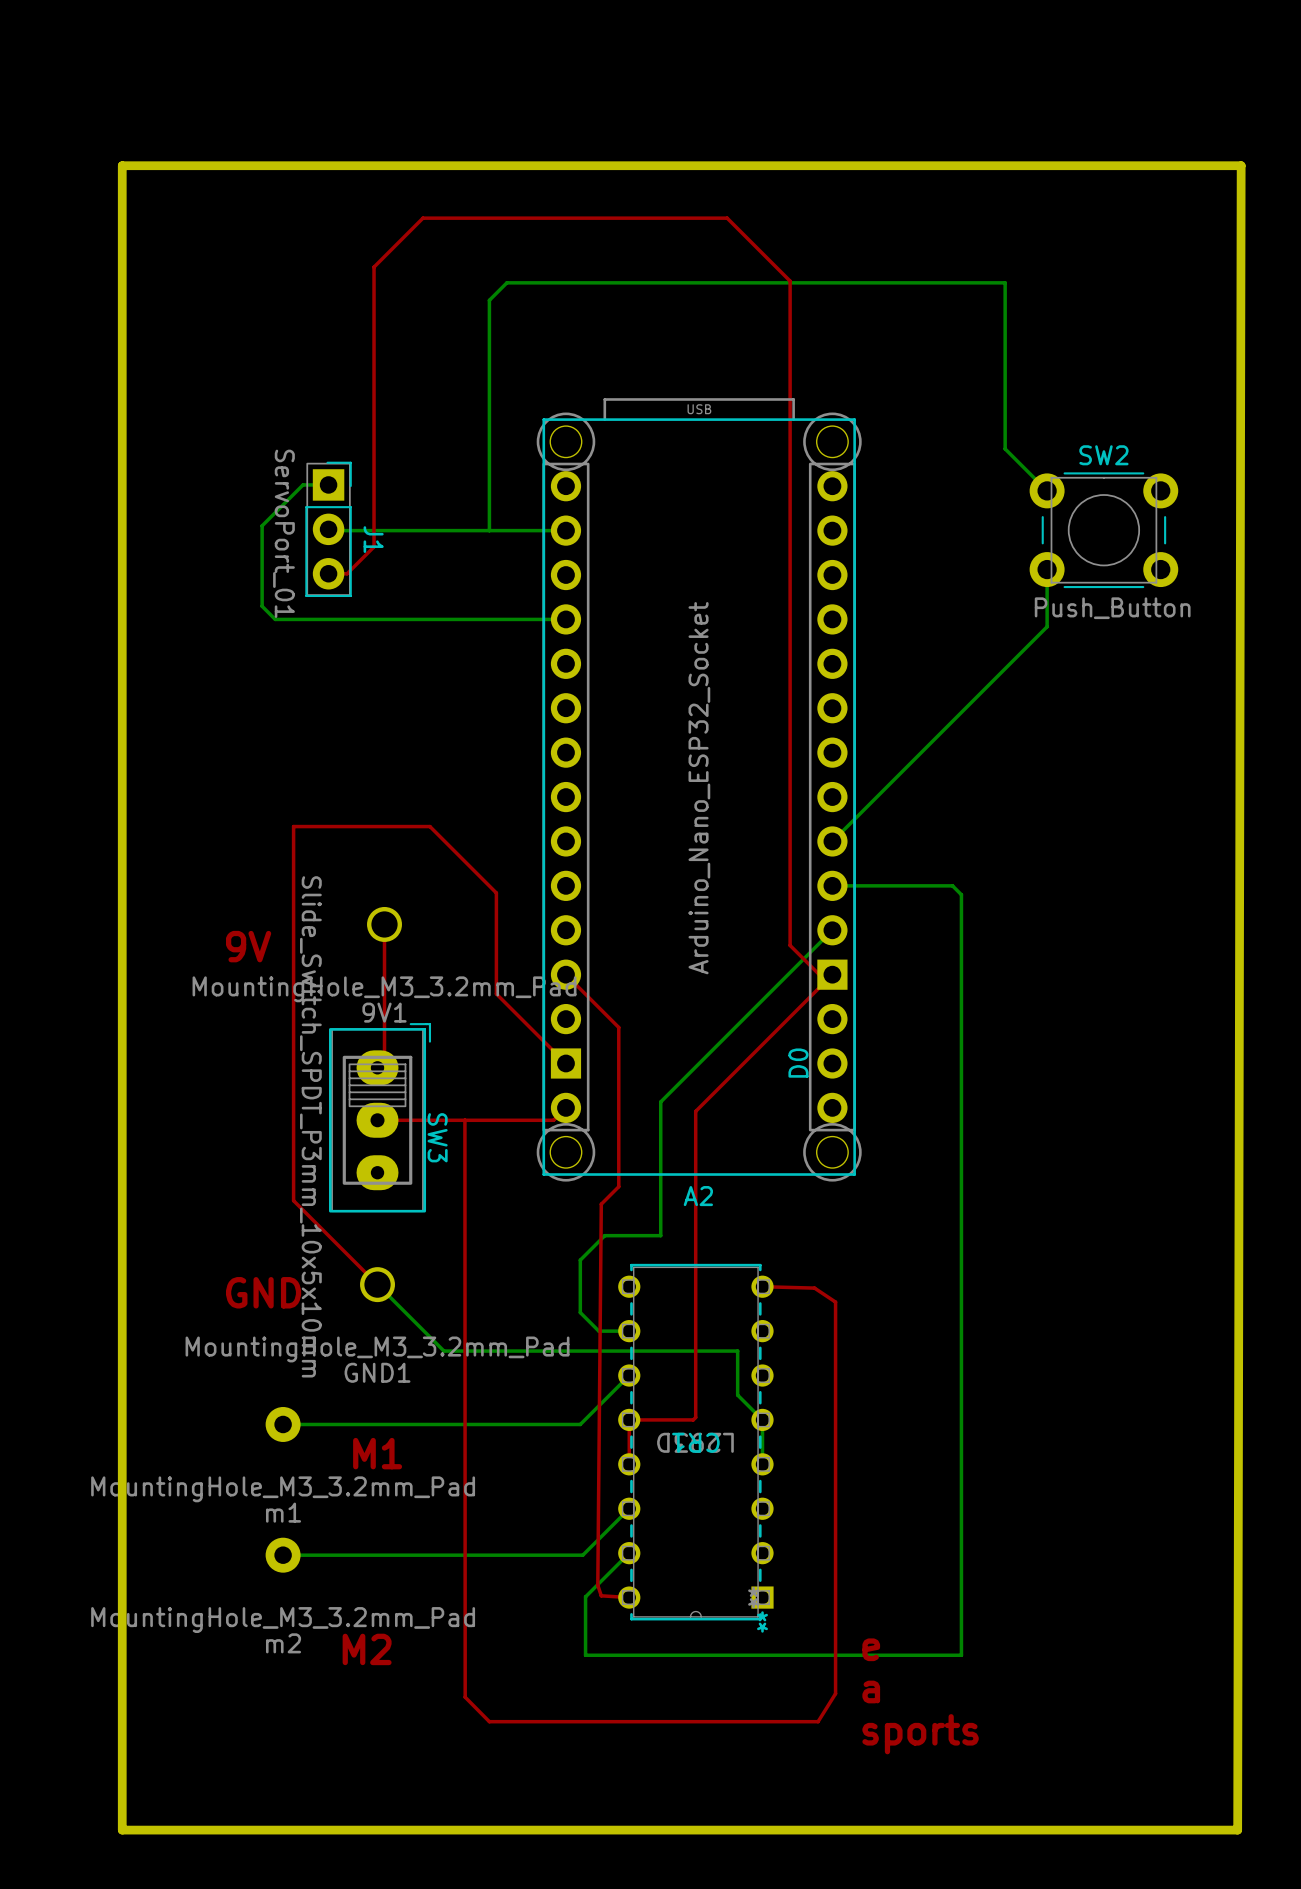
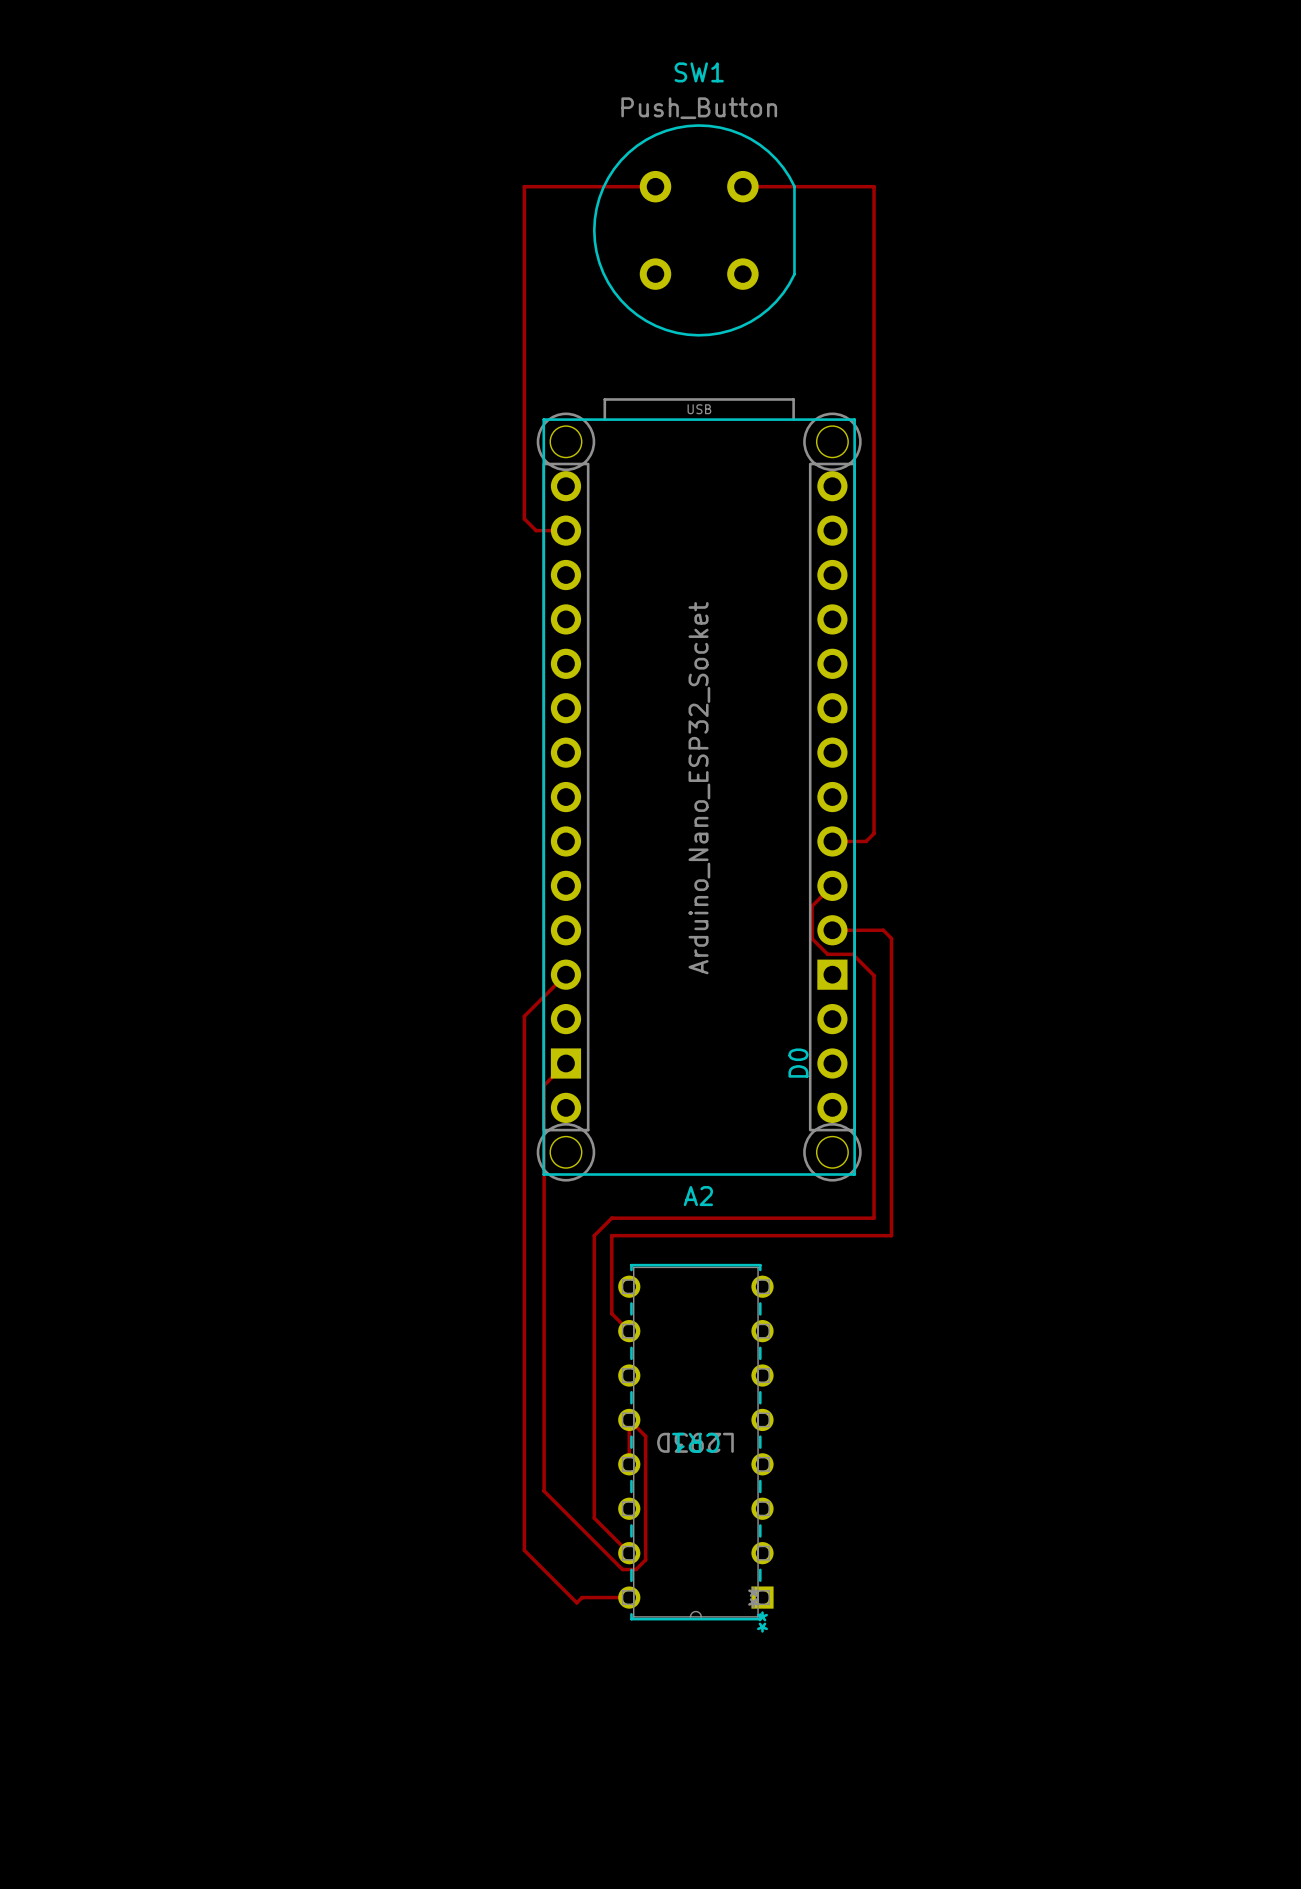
board edge: (122, 165) (1241, 165) (1237, 1830) (122, 1830) (122, 165) -> none
top track: none -> (655, 186) (524, 186) (524, 518) (536, 530) (565, 530)
top track: none -> (742, 186) (874, 186) (874, 833) (866, 841) (832, 841)
SW1: none -> Push_Button (694, 230)
bottom track: (328, 484) (303, 484) (262, 525) (262, 606) (275, 619) (565, 619) -> none
bottom track: (1047, 490) (1005, 448) (1005, 282) (506, 282) (489, 300) (489, 530) -> none
bottom track: (328, 529) (565, 530) -> none
J1: ServoPort_01 (328, 529) -> none
SW2: Push_Button (1103, 530) -> none
bottom track: (1047, 569) (1047, 626) (832, 841) -> none
top track: (328, 573) (347, 573) (374, 546) (374, 267) (422, 218) (727, 218) (790, 281) (790, 945) (819, 974) (832, 974) (695, 1111) (695, 1417) (693, 1419) (629, 1419) -> none
bottom track: (832, 885) (952, 885) (961, 894) (961, 1655) (585, 1655) (585, 1596) (629, 1553) -> none
top track: none -> (832, 885) (812, 906) (812, 938) (827, 954) (852, 954) (874, 975) (874, 1218) (611, 1218) (594, 1235) (594, 1518) (629, 1553)
top track: (384, 924) (384, 1060) (377, 1067) -> none
9V1: MountingHole_M3_3.2mm_Pad (384, 924) -> none
bottom track: (832, 930) (660, 1101) (660, 1235) (604, 1235) (580, 1260) (580, 1312) (598, 1331) (629, 1331) -> none
top track: none -> (832, 930) (883, 930) (891, 938) (891, 1235) (611, 1235) (611, 1313) (629, 1331)
text: 9V (248, 946) -> none
top track: (565, 974) (618, 1027) (618, 1186) (601, 1204) (597, 1585) (601, 1595) (629, 1597) -> (565, 974) (524, 1016) (524, 1550) (576, 1602) (582, 1597) (629, 1597)
top track: (565, 1063) (496, 993) (496, 893) (429, 826) (293, 826) (293, 1200) (377, 1284) -> (565, 1063) (544, 1085) (544, 1491) (622, 1569) (636, 1569) (645, 1559) (645, 1436) (629, 1419)
top track: (565, 1107) (553, 1120) (377, 1120) -> none
SW3: Slide_Switch_SPDT_P3mm_10x5x10mm (380, 1117) -> none
top track: (464, 1120) (465, 1697) (489, 1721) (818, 1721) (835, 1693) (835, 1302) (814, 1288) (762, 1286) -> none
bottom track: (377, 1284) (443, 1351) (737, 1351) (737, 1395) (762, 1419) (762, 1464) -> none
GND1: MountingHole_M3_3.2mm_Pad (377, 1284) -> none
text: GND (263, 1292) -> none
bottom track: (629, 1375) (580, 1424) (283, 1424) -> none
m1: MountingHole_M3_3.2mm_Pad (283, 1424) -> none
text: M1 (377, 1453) -> none
bottom track: (629, 1508) (582, 1555) (283, 1555) -> none
m2: MountingHole_M3_3.2mm_Pad (283, 1555) -> none
text: M2 (367, 1649) -> none
text: e (871, 1649) -> none
text: a (871, 1692) -> none
text: sports (920, 1734) -> none

